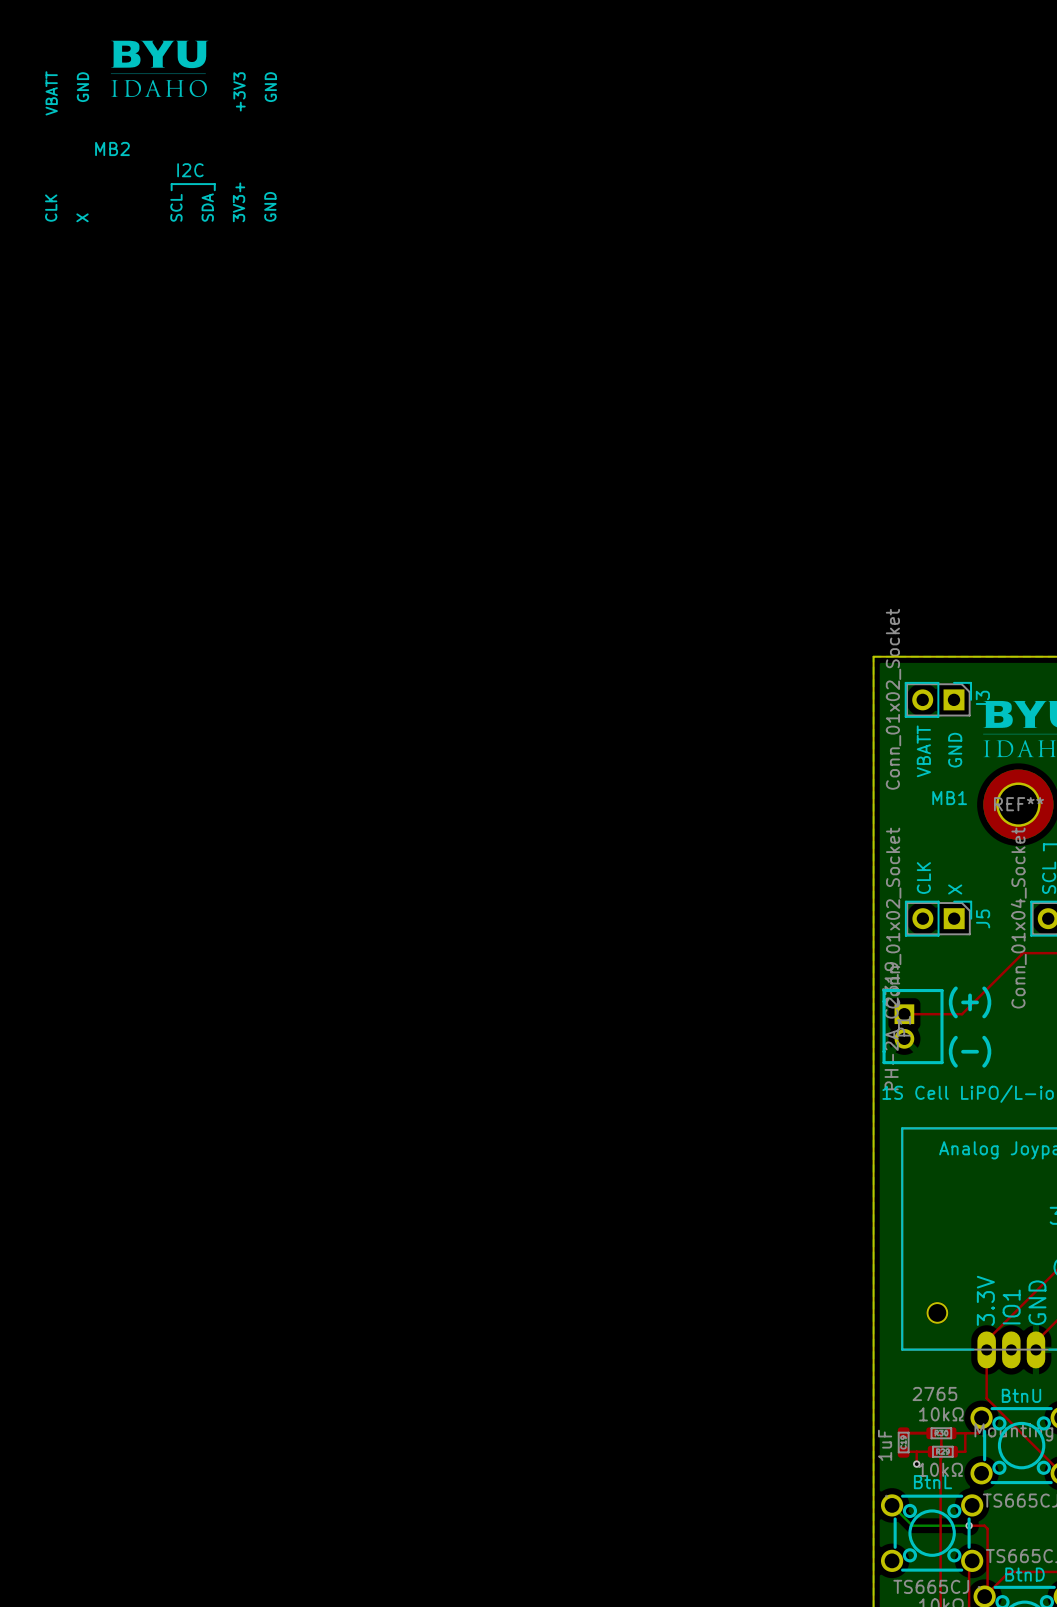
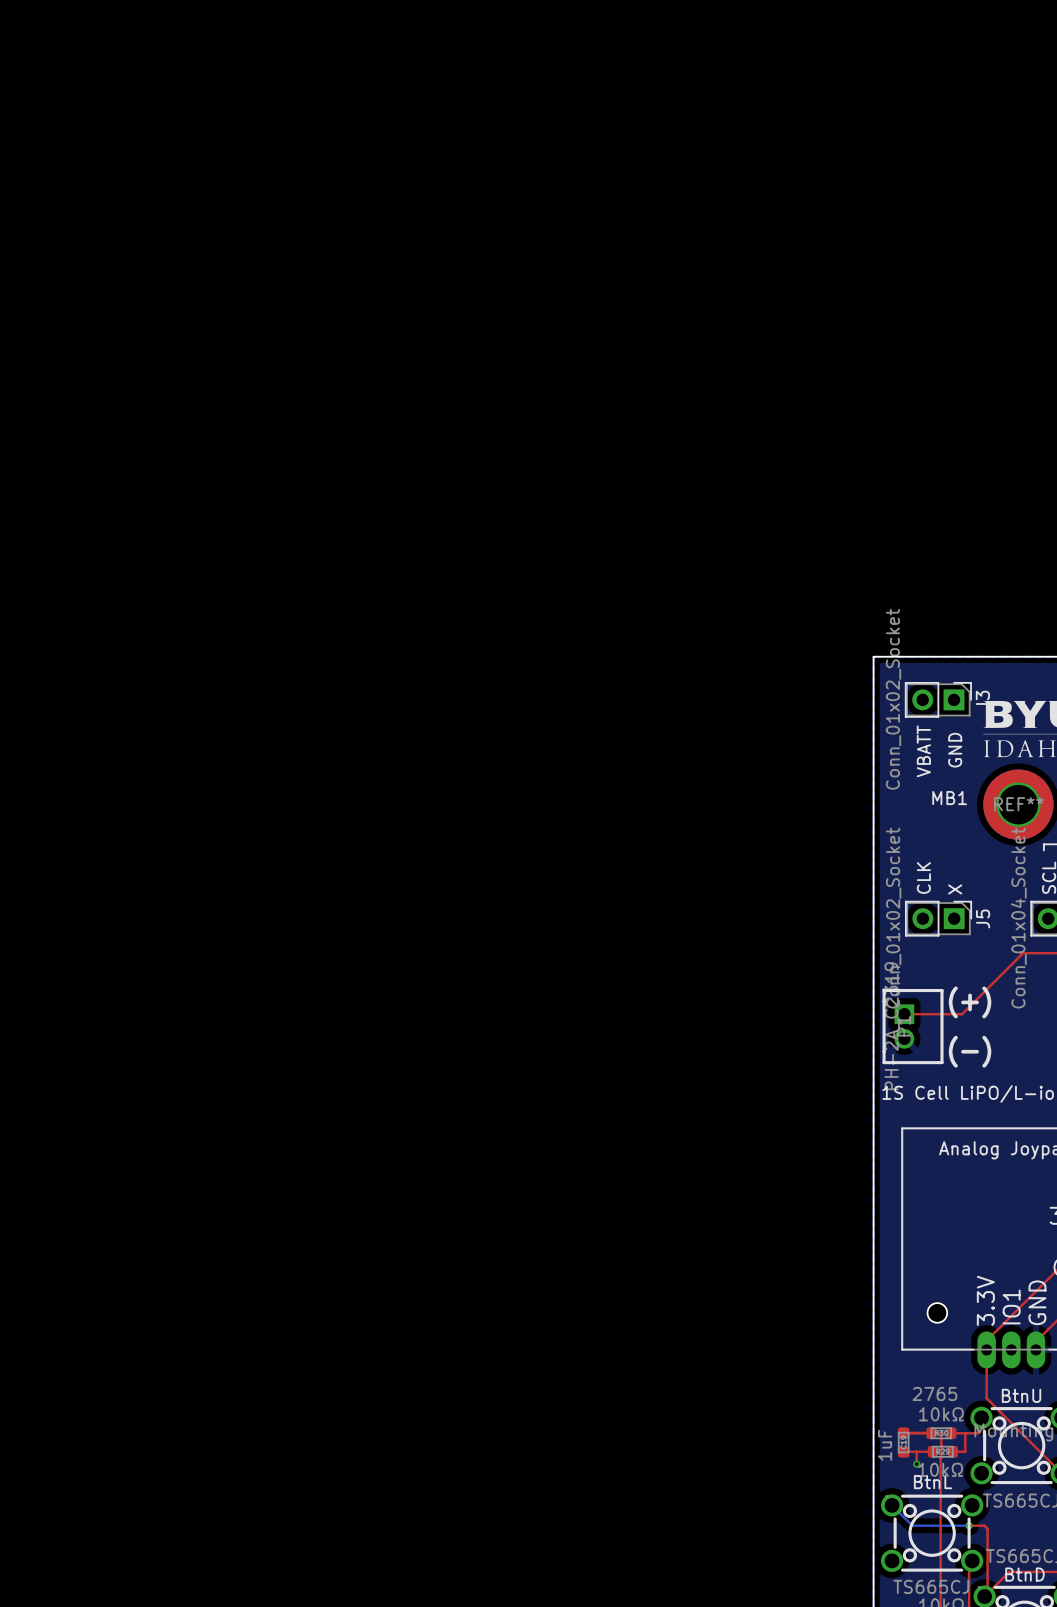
MB2: (163, 115) -> none

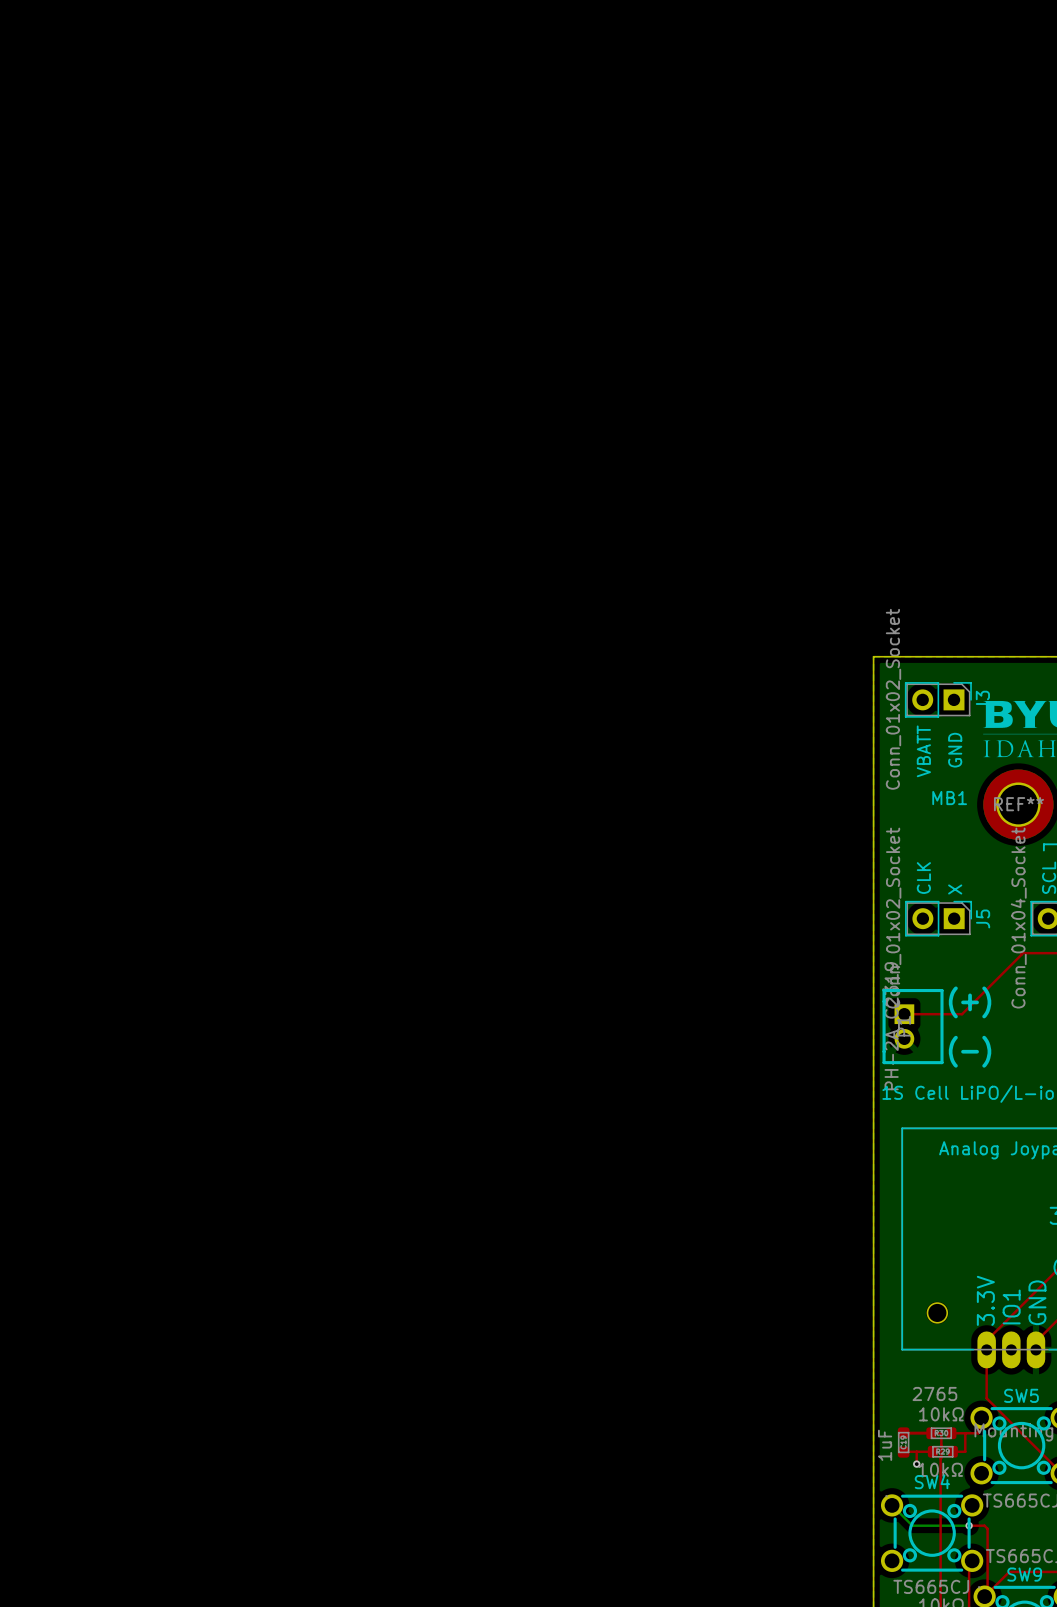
BtnU name: BtnU (1021, 1395) -> SW5 (1021, 1395)
BtnL name: BtnL (933, 1482) -> SW4 (932, 1481)
BtnD name: BtnD (1024, 1574) -> SW9 (1024, 1574)

